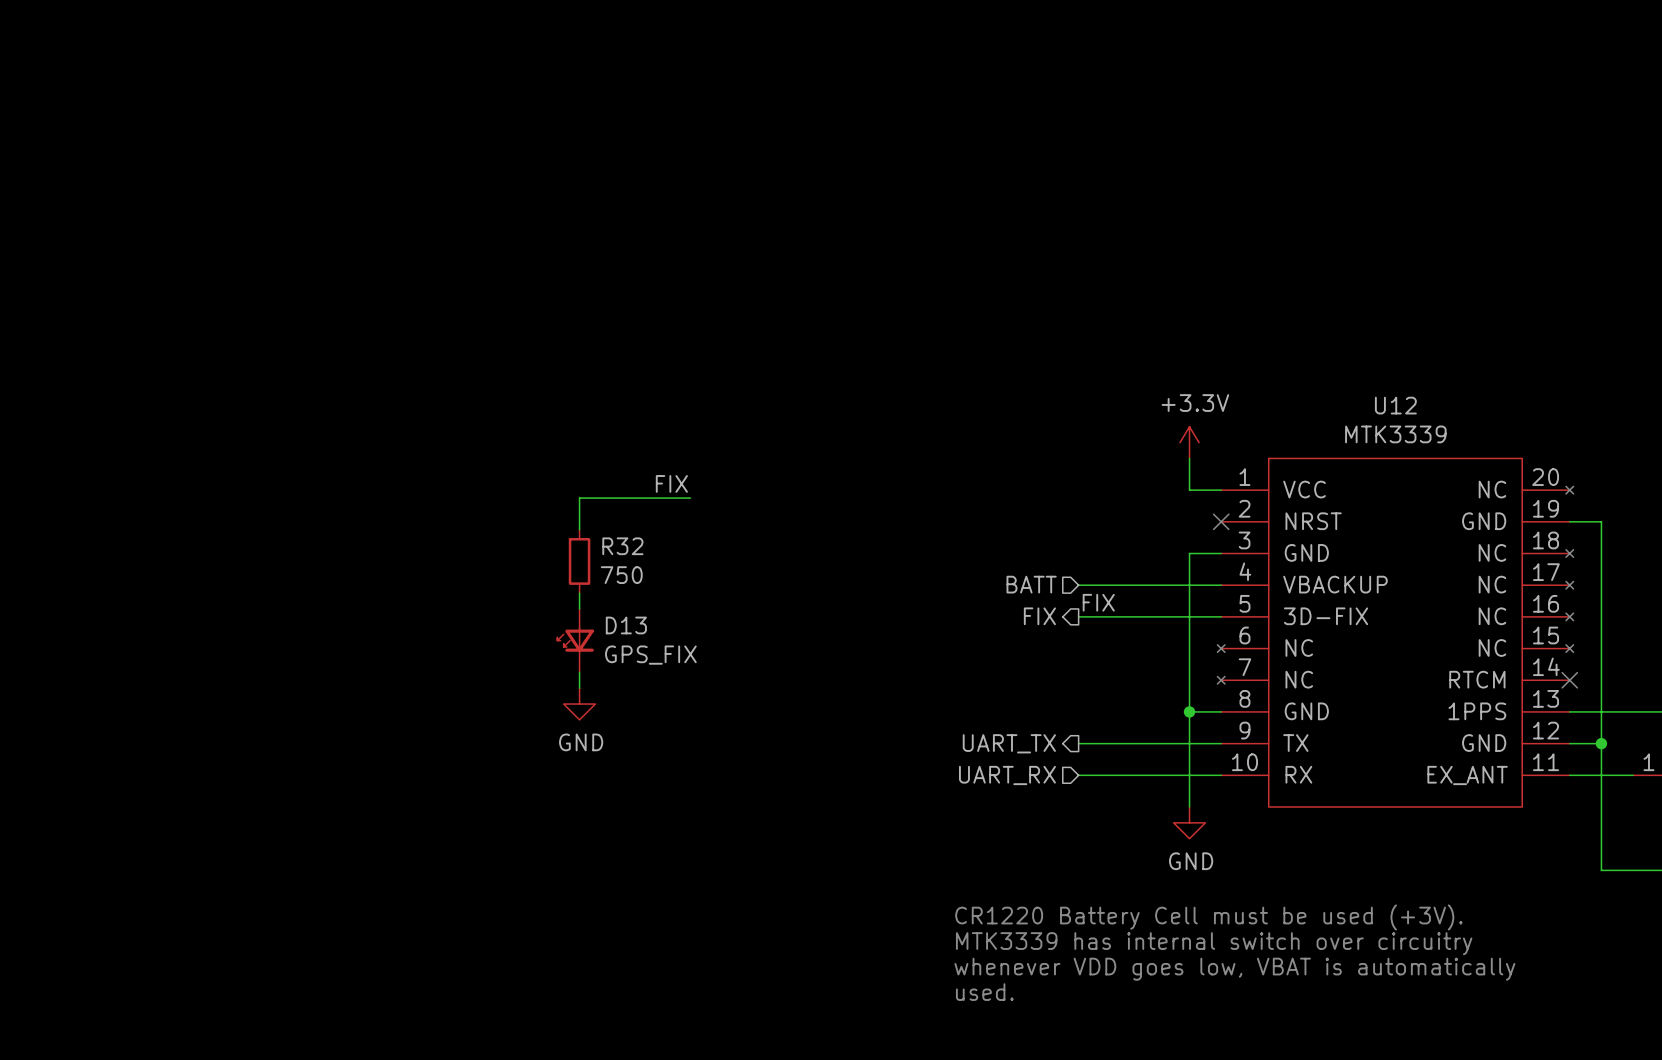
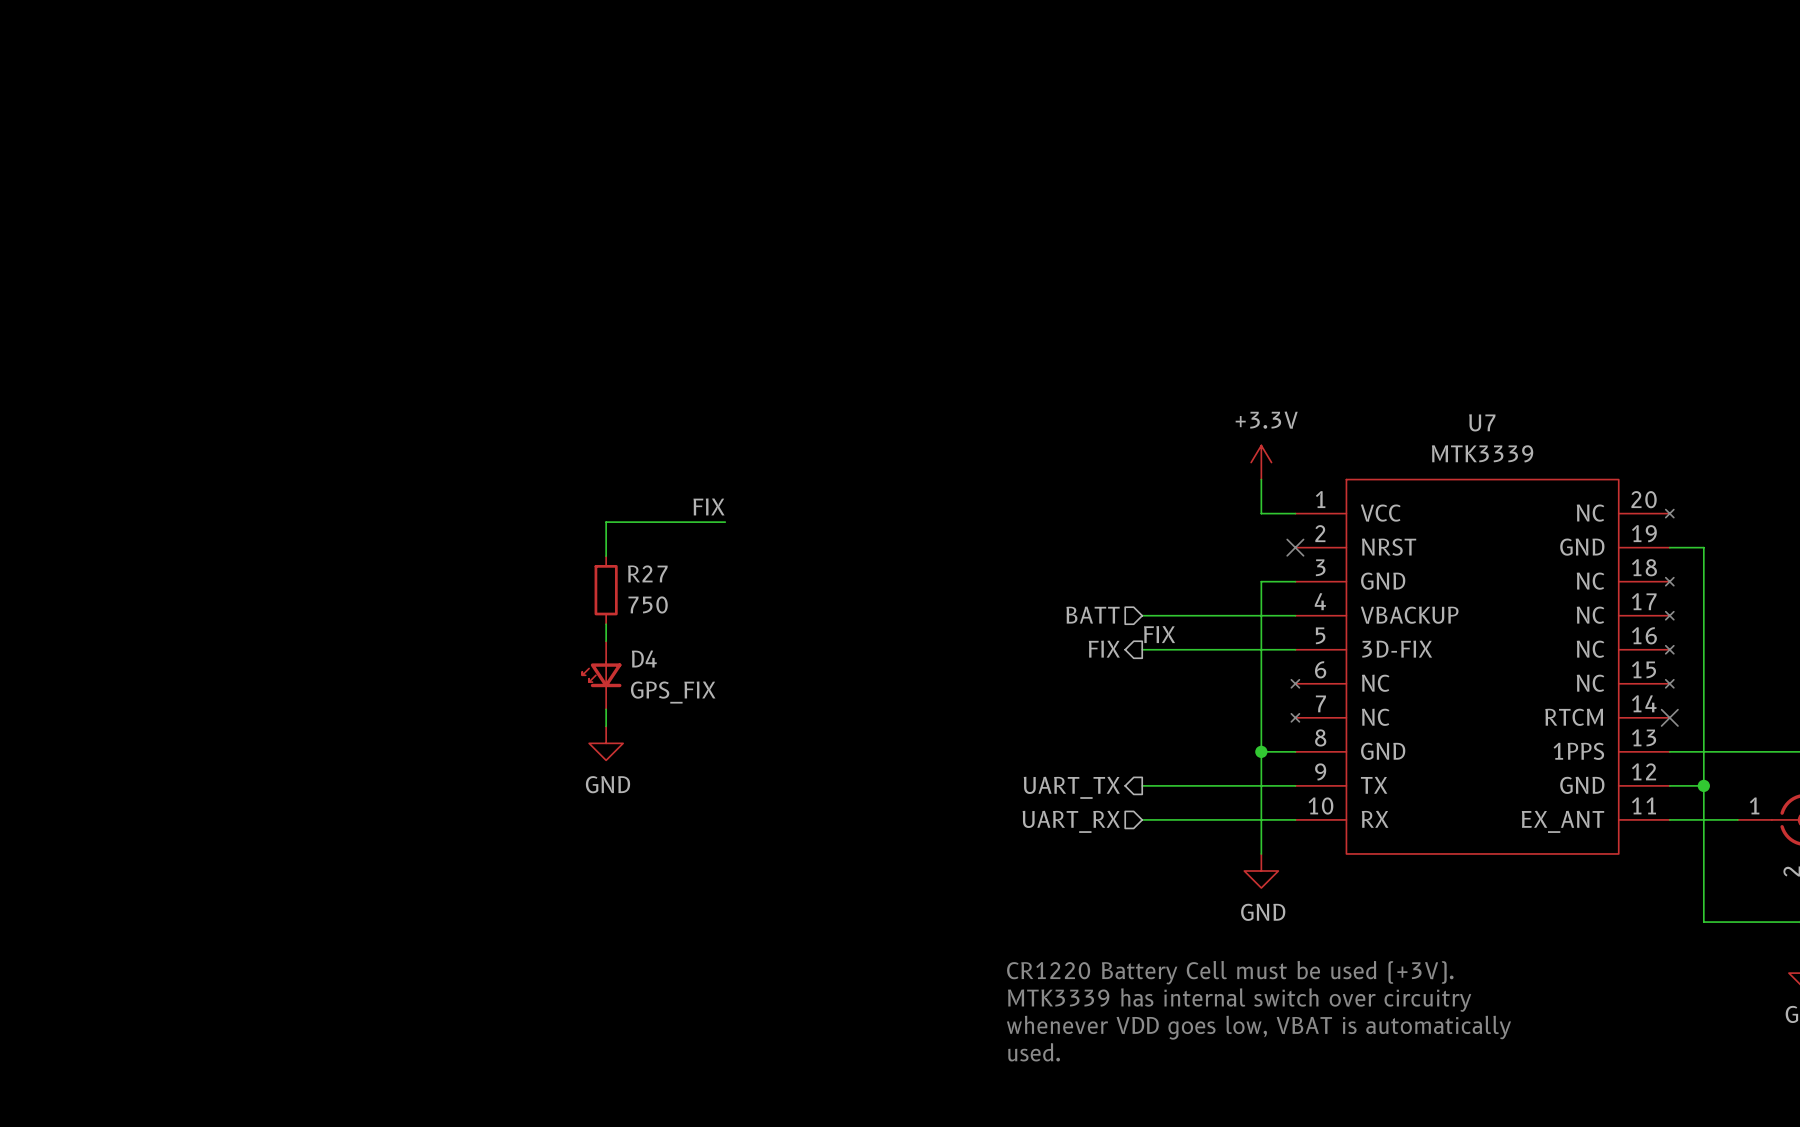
U12 name: U12 (1395, 405) -> U7 (1482, 422)
R32 name: R32 (622, 546) -> R27 (647, 573)
D13 name: D13 (626, 625) -> D4 (644, 658)

